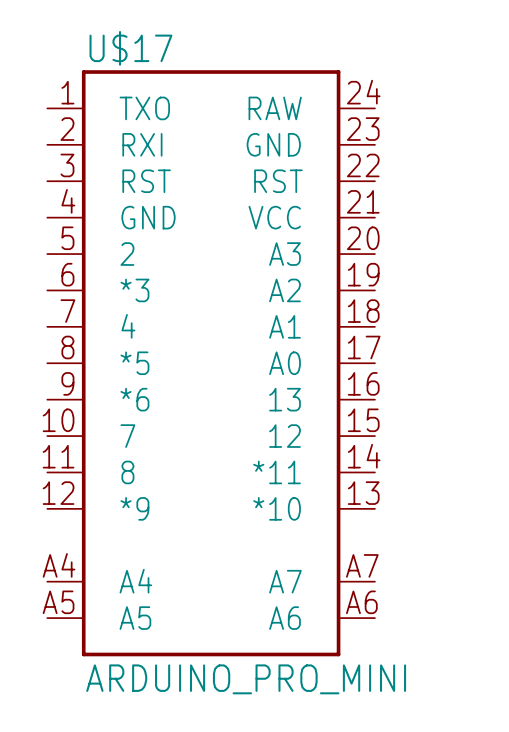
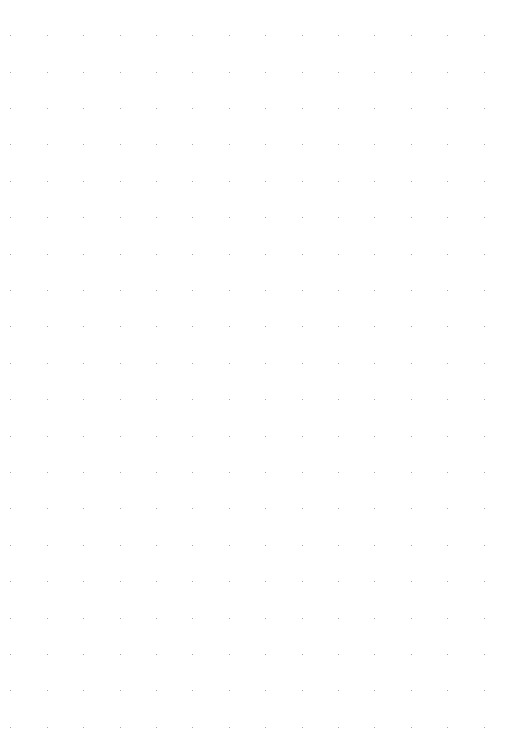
U$17: ARDUINO_PRO_MINI (211, 363) -> none

